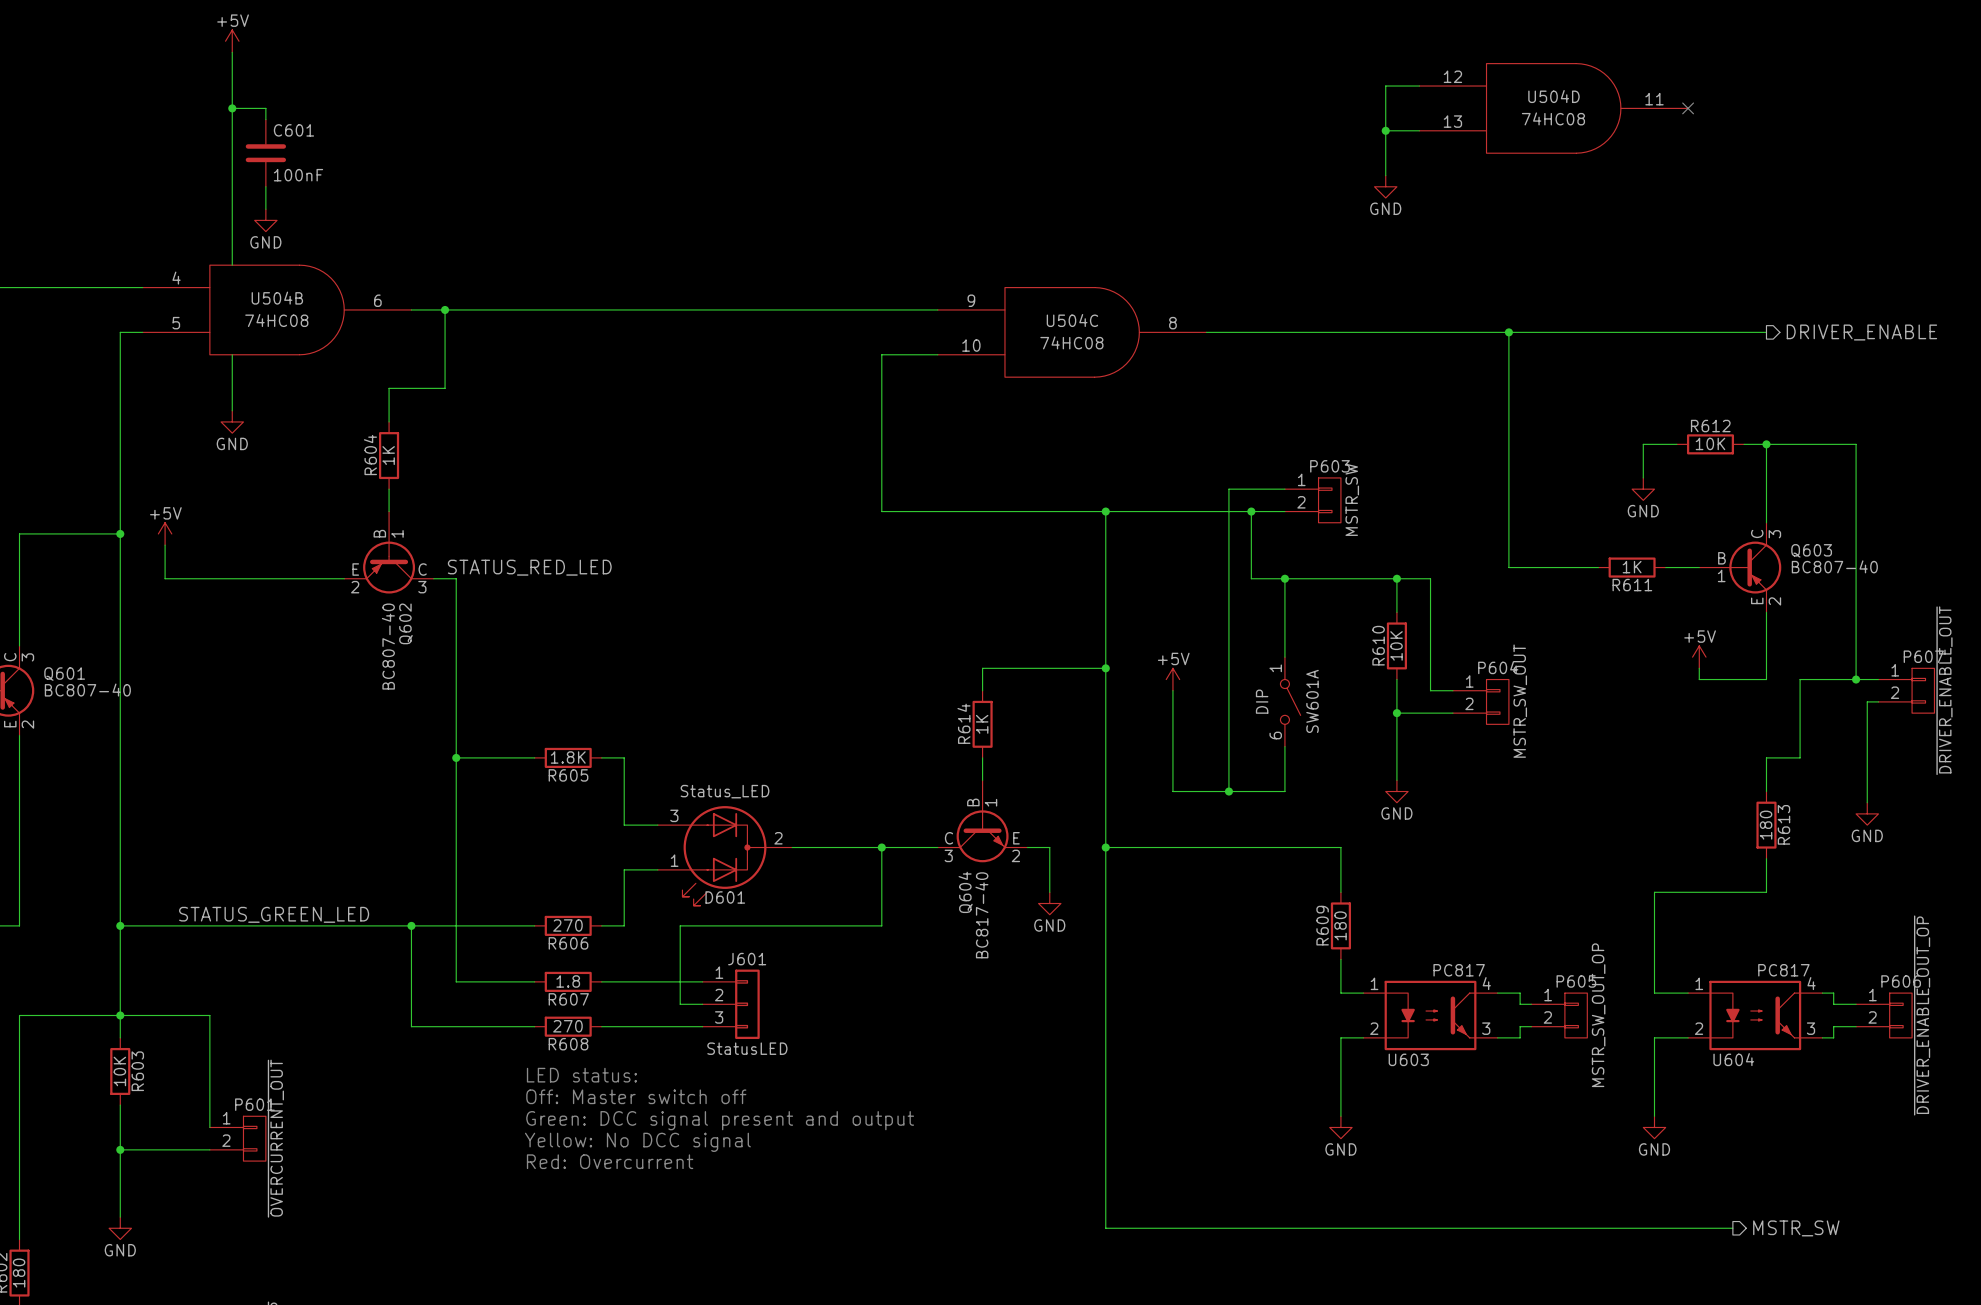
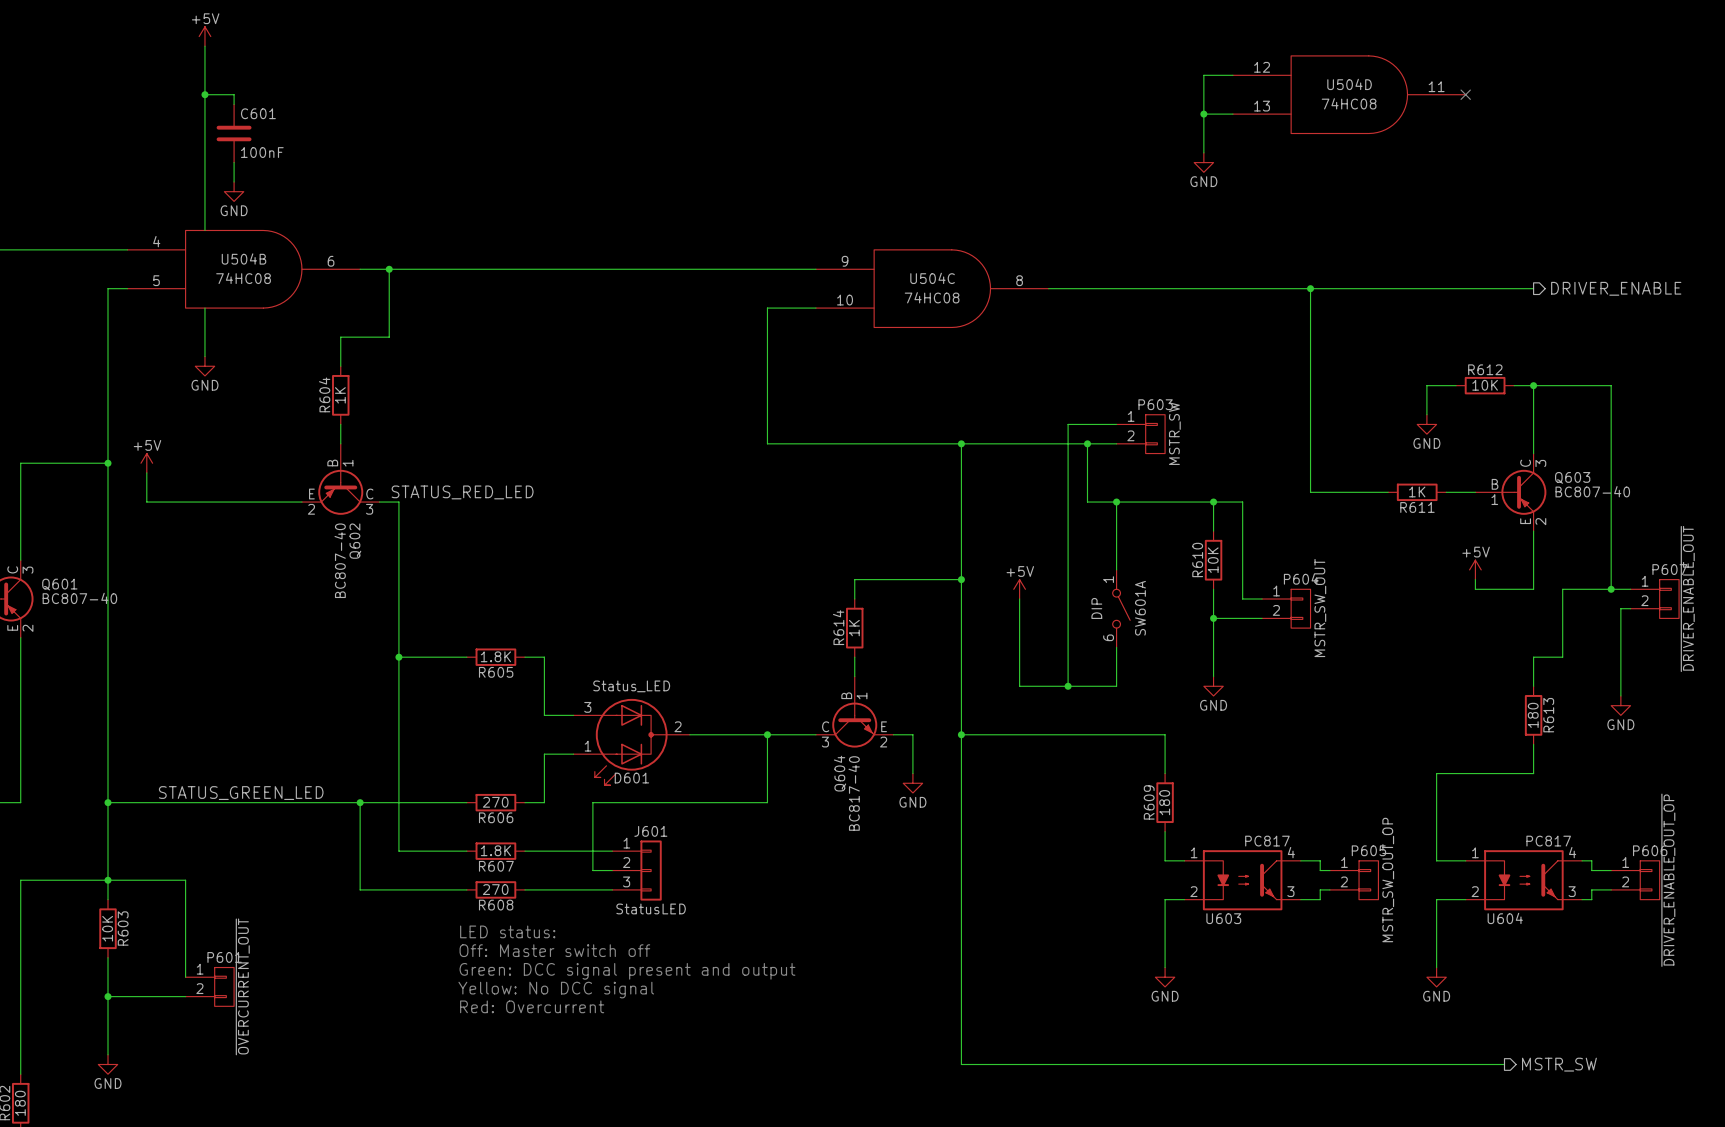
R607 value: 1.8 (568, 981) -> 1.8K (495, 850)

